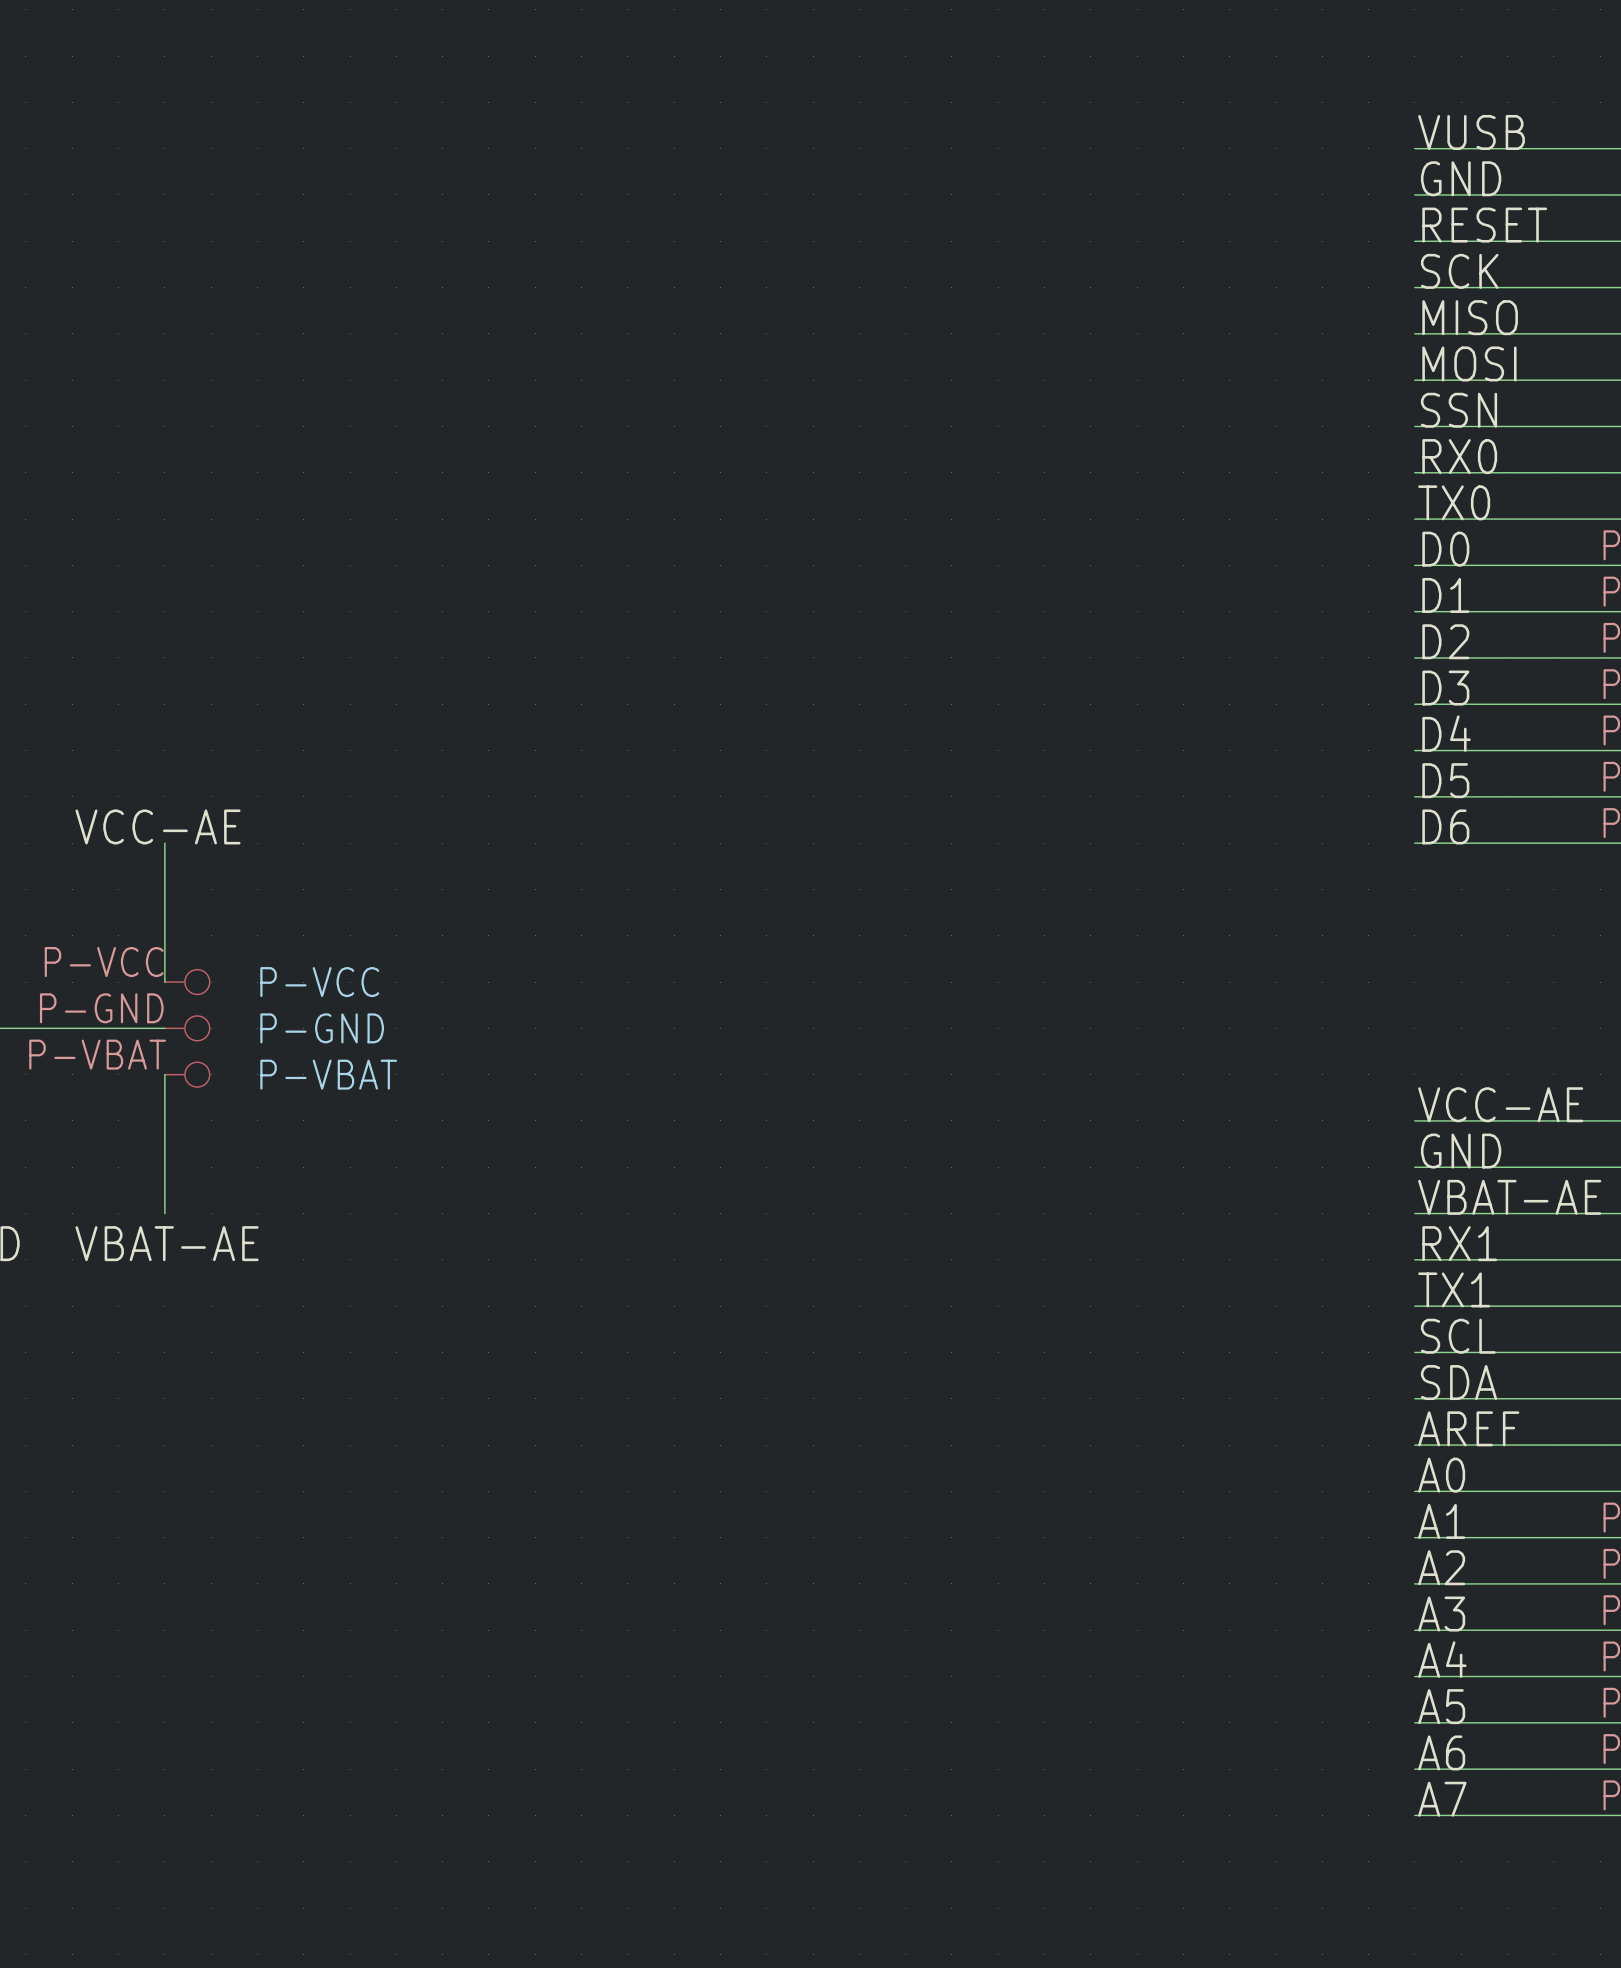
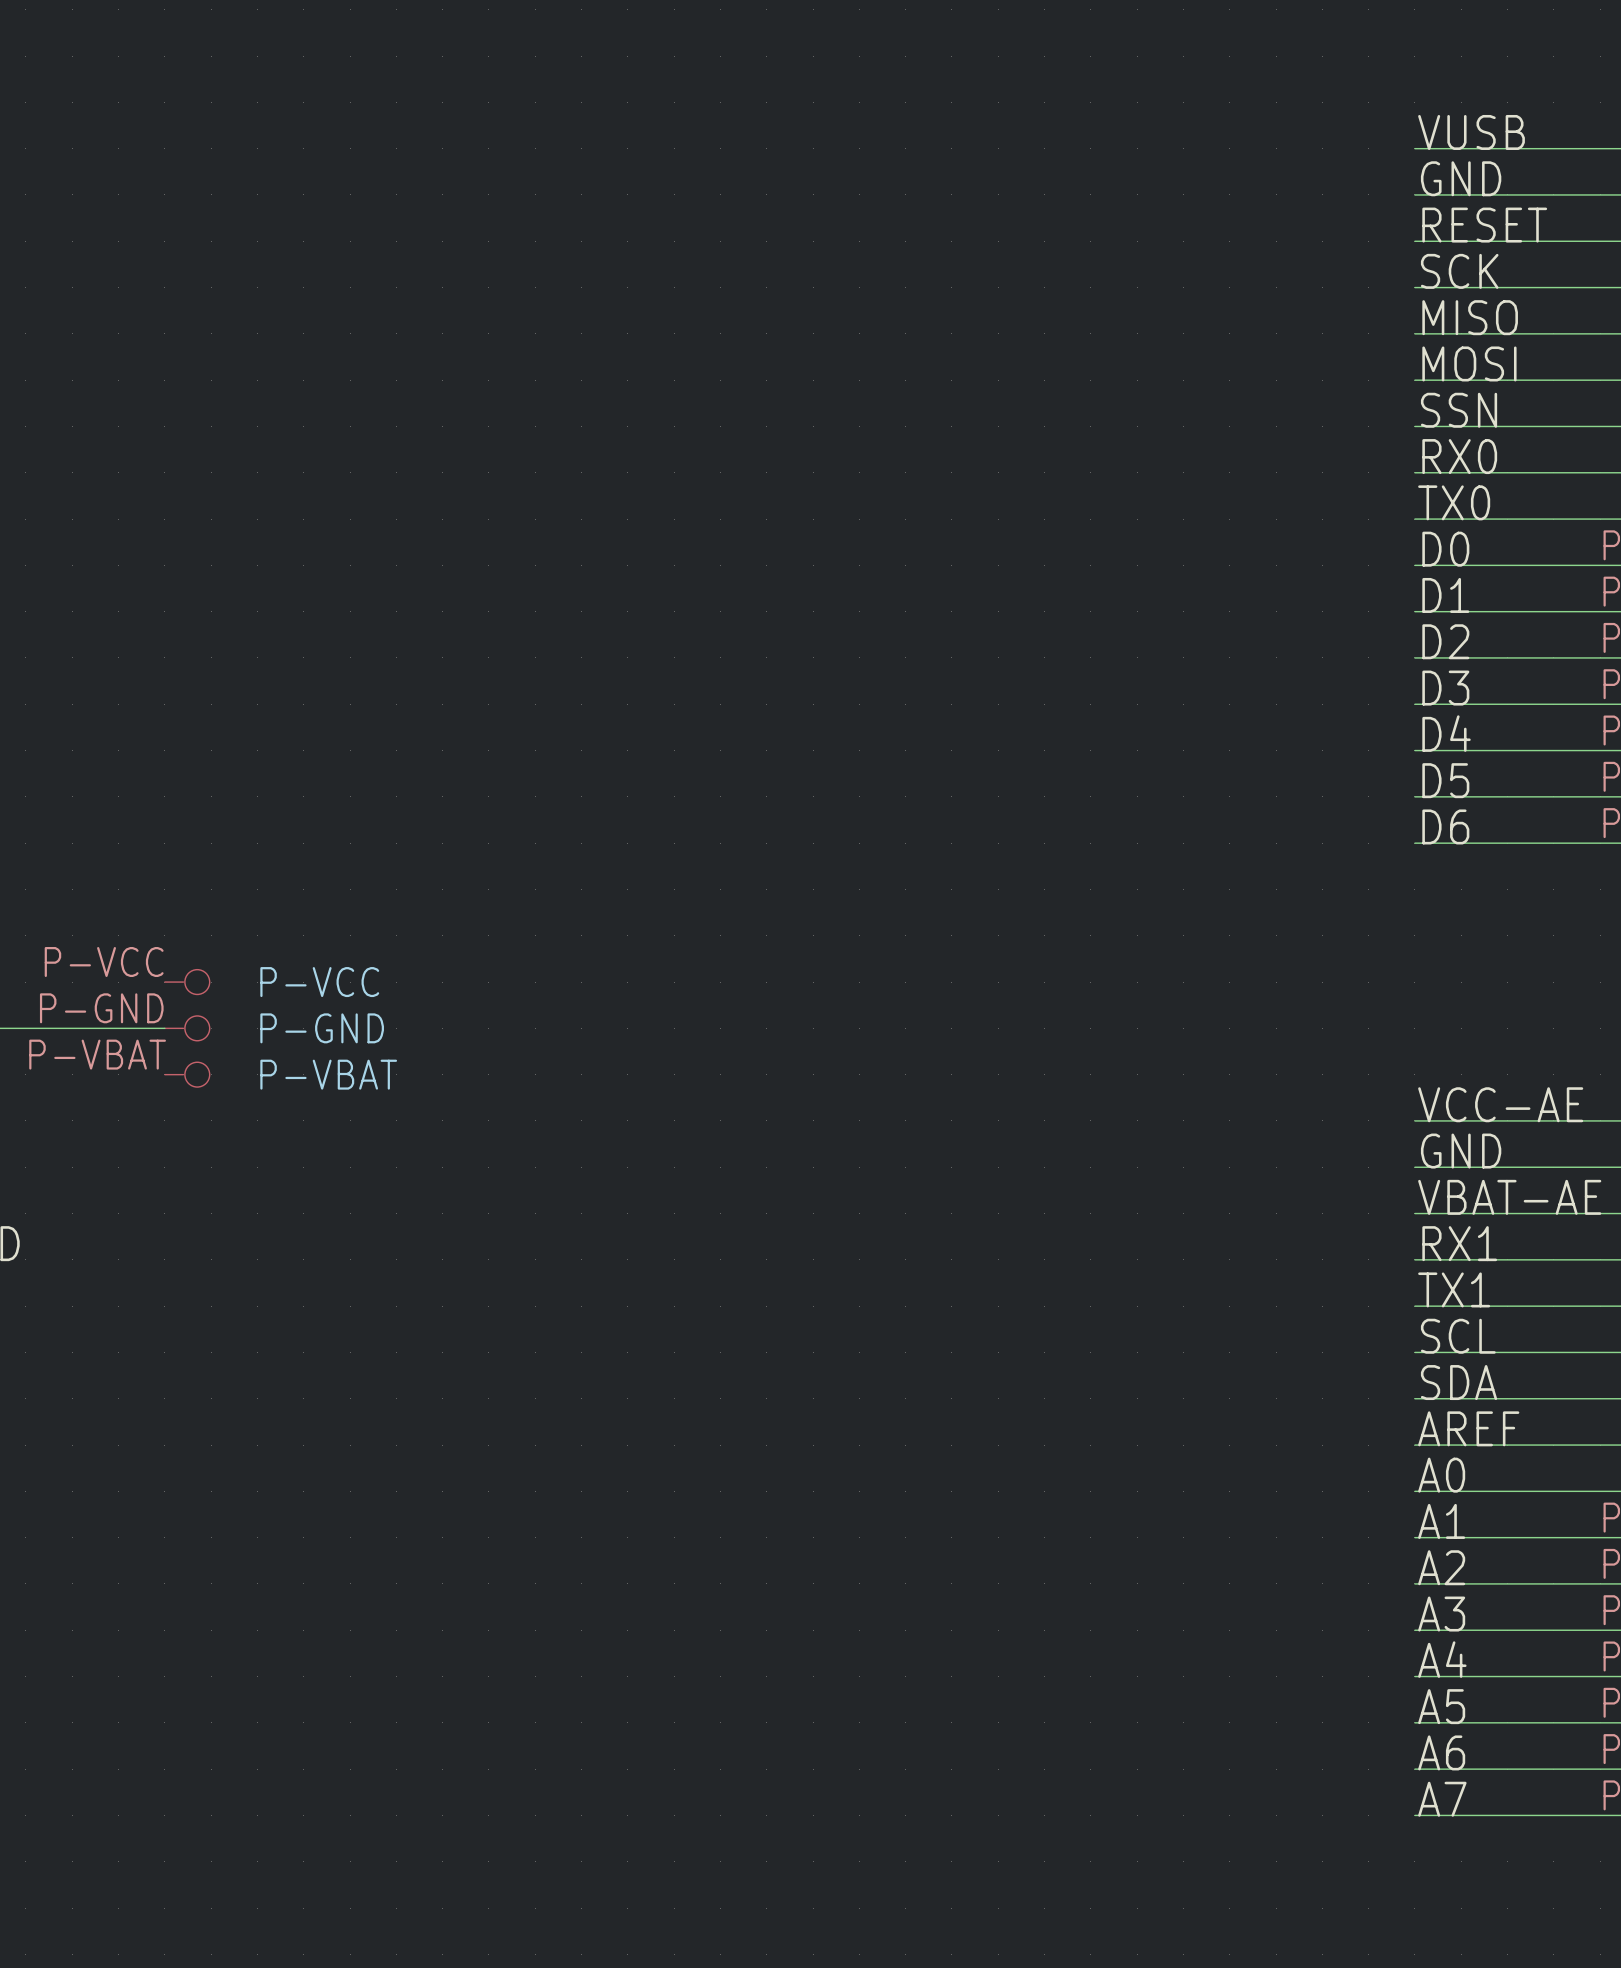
label: VCC-AE (158, 826) -> none
wire: (164, 843) (164, 982) -> none
wire: (164, 1074) (164, 1213) -> none
label: VBAT-AE (167, 1243) -> none

